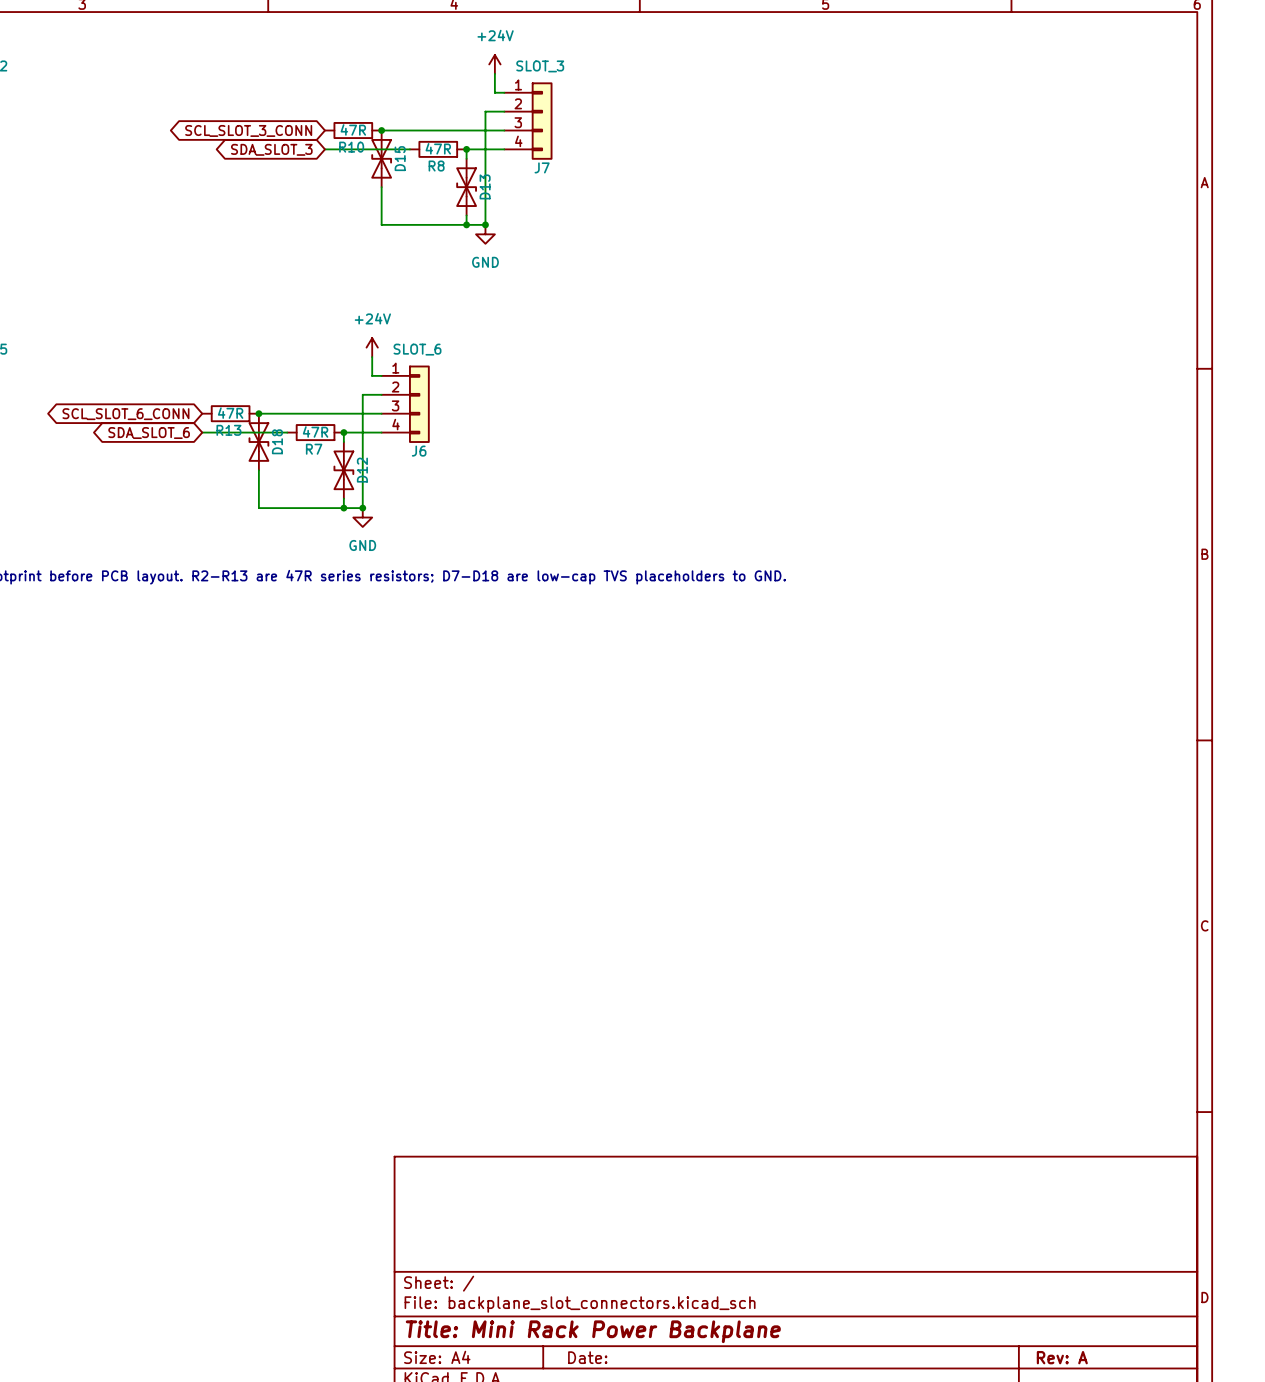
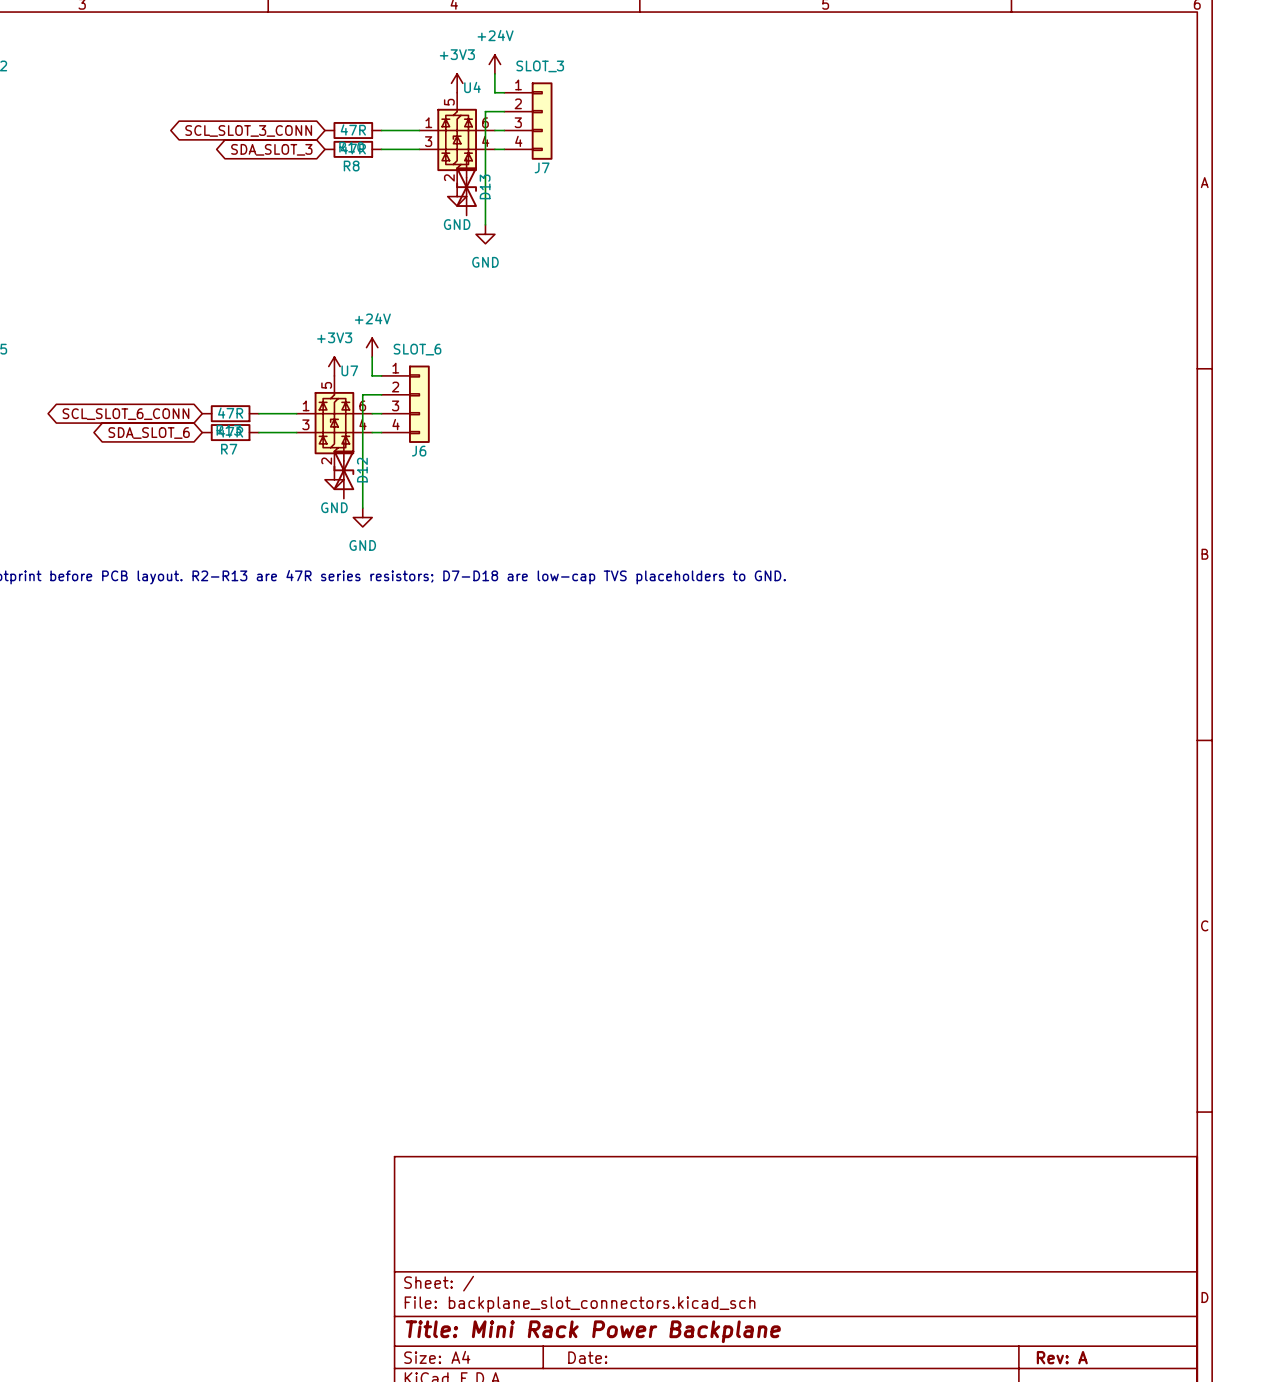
power symbol: none -> +3V3 (457, 83)
junction: (381, 130) -> none
U4: none -> (457, 139)
R8 position: (438, 149) -> (353, 149)
junction: (466, 149) -> none
D15: (381, 158) -> none
wire: (381, 187) (381, 224) (485, 224) -> none
power symbol: none -> GND (457, 196)
wire: (466, 215) (466, 224) -> none
junction: (466, 224) -> none
junction: (485, 224) -> none
power symbol: none -> +3V3 (334, 366)
junction: (258, 413) -> none
U7: none -> (334, 423)
R7 position: (315, 432) -> (230, 432)
junction: (343, 432) -> none
D18: (258, 442) -> none
wire: (258, 470) (258, 508) (362, 508) -> none
power symbol: none -> GND (334, 479)
wire: (343, 498) (343, 508) -> none
junction: (343, 508) -> none
junction: (362, 508) -> none

